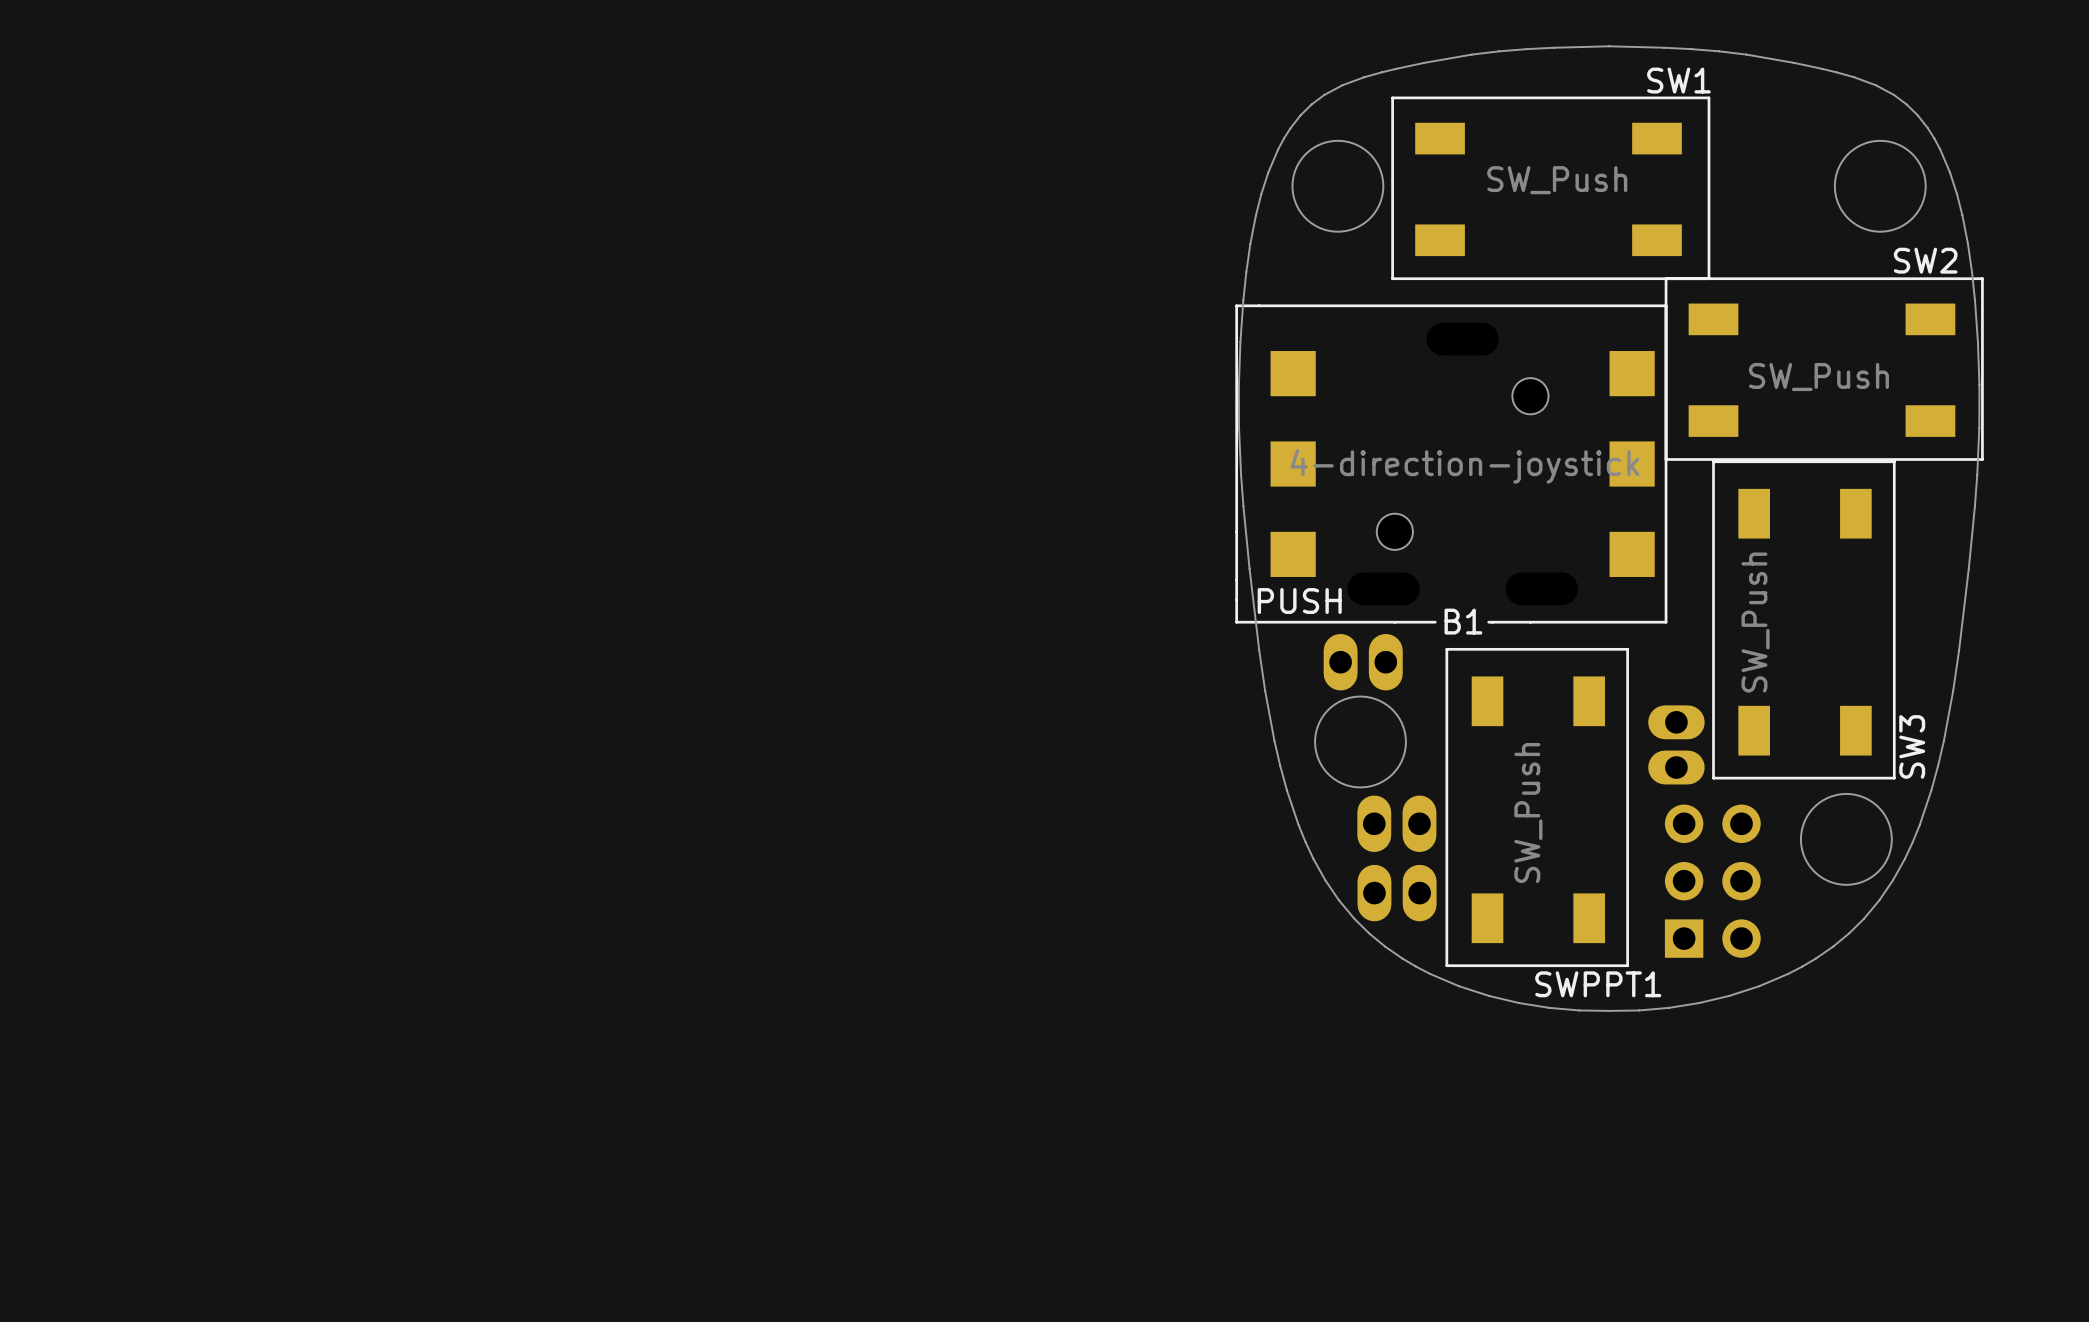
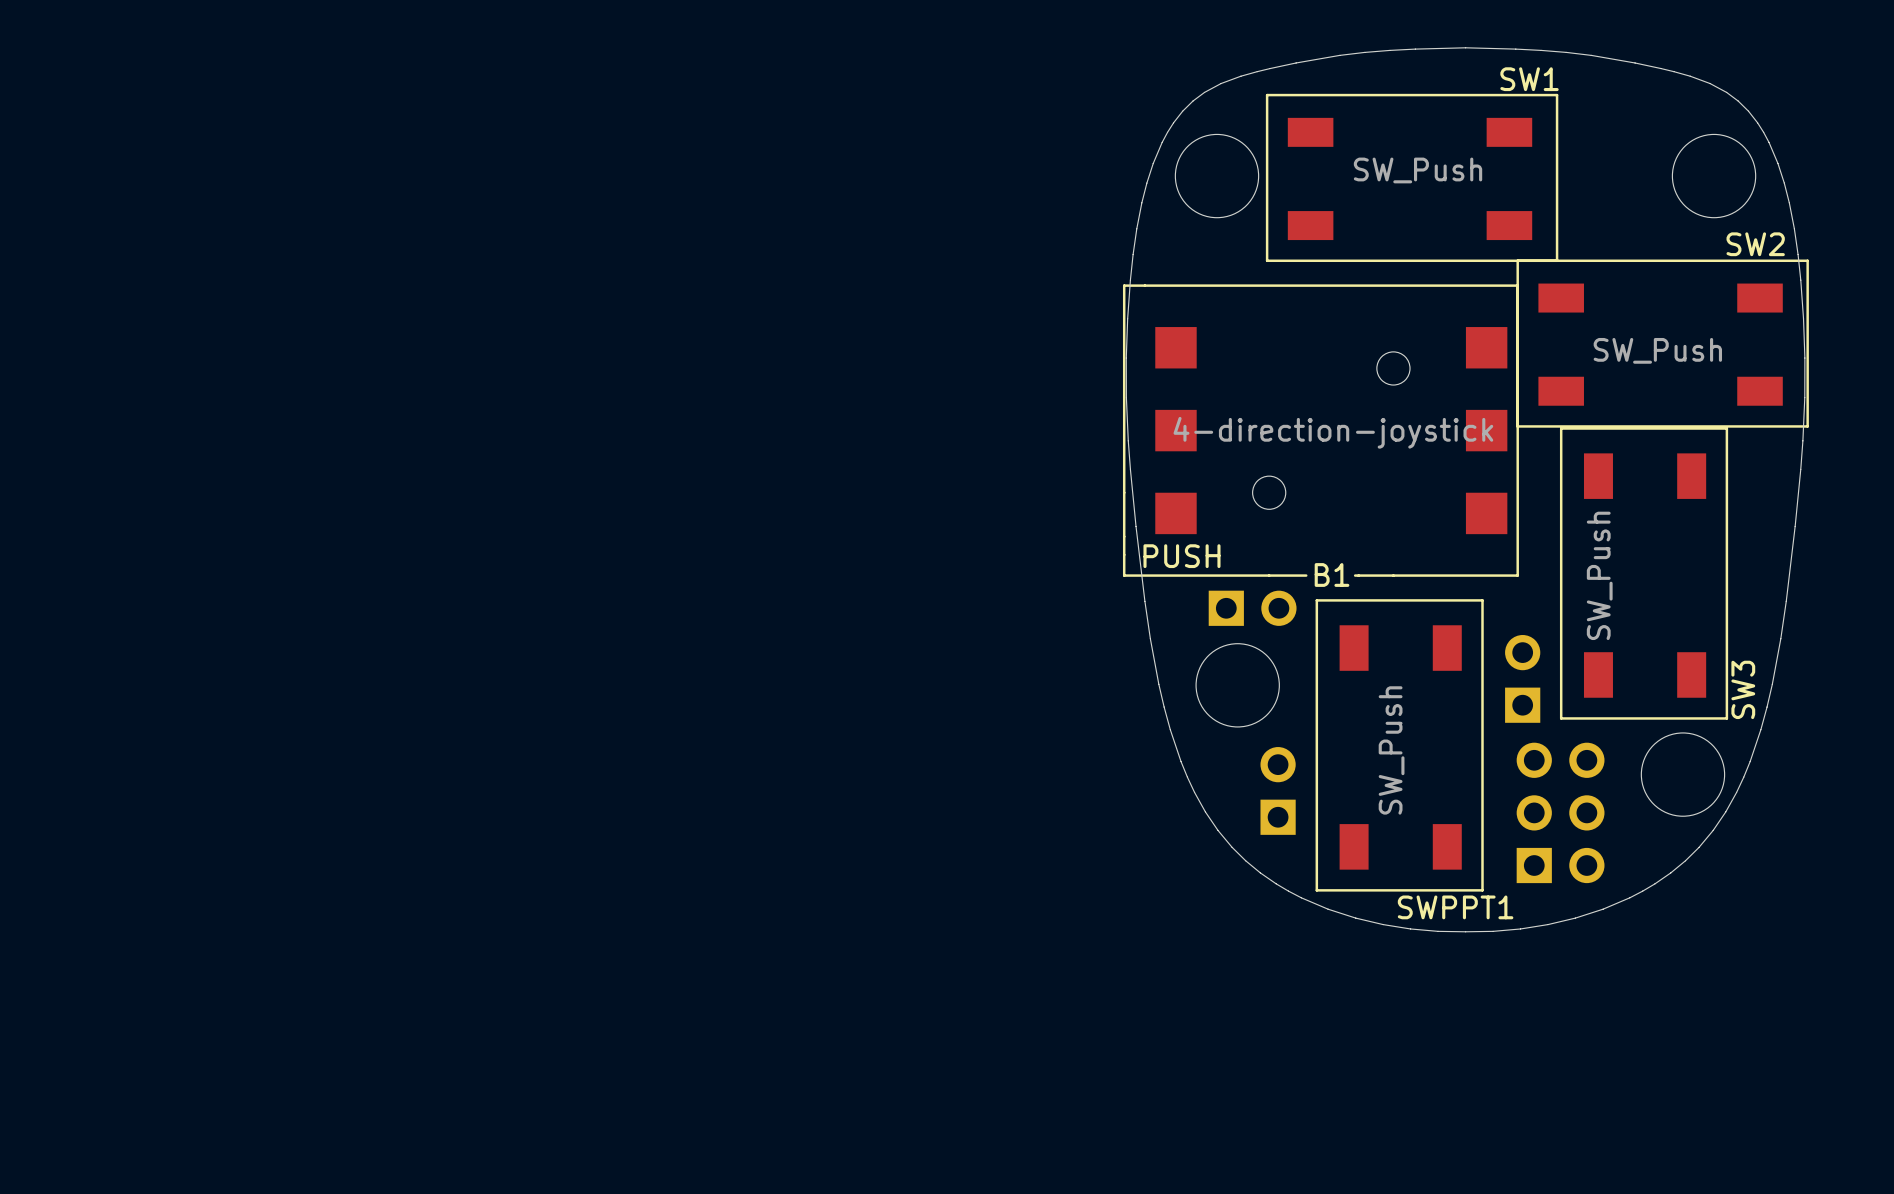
part footprint: [1323, 633, 1403, 691] -> [1208, 590, 1297, 626]
part footprint: [1648, 705, 1705, 785] -> [1505, 635, 1541, 723]
part: (1396, 823) -> none
part: none -> (1278, 790)
part: (1397, 893) -> none

